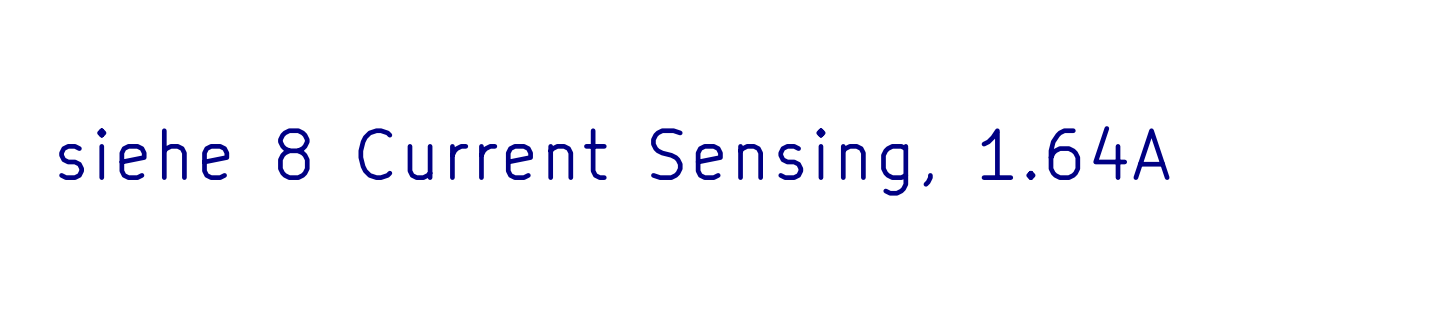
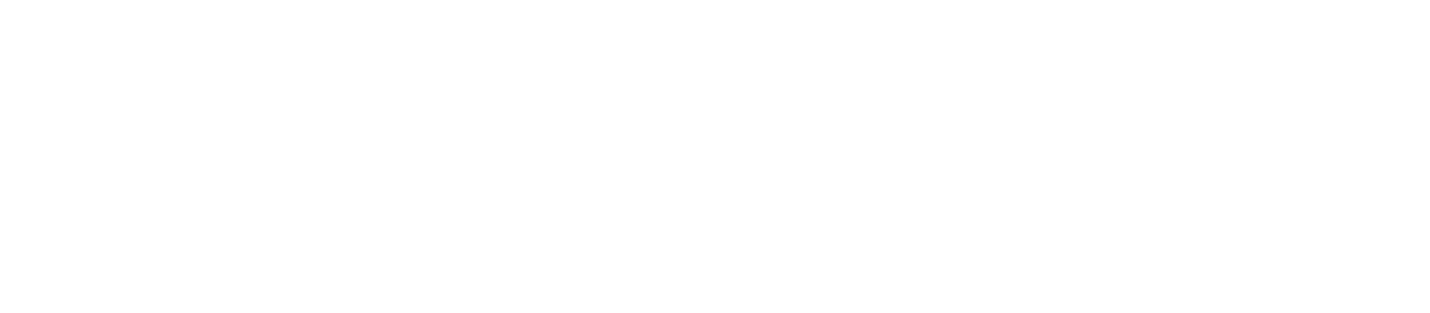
text: siehe 8 Current Sensing, 1.64A (614, 160) -> none

